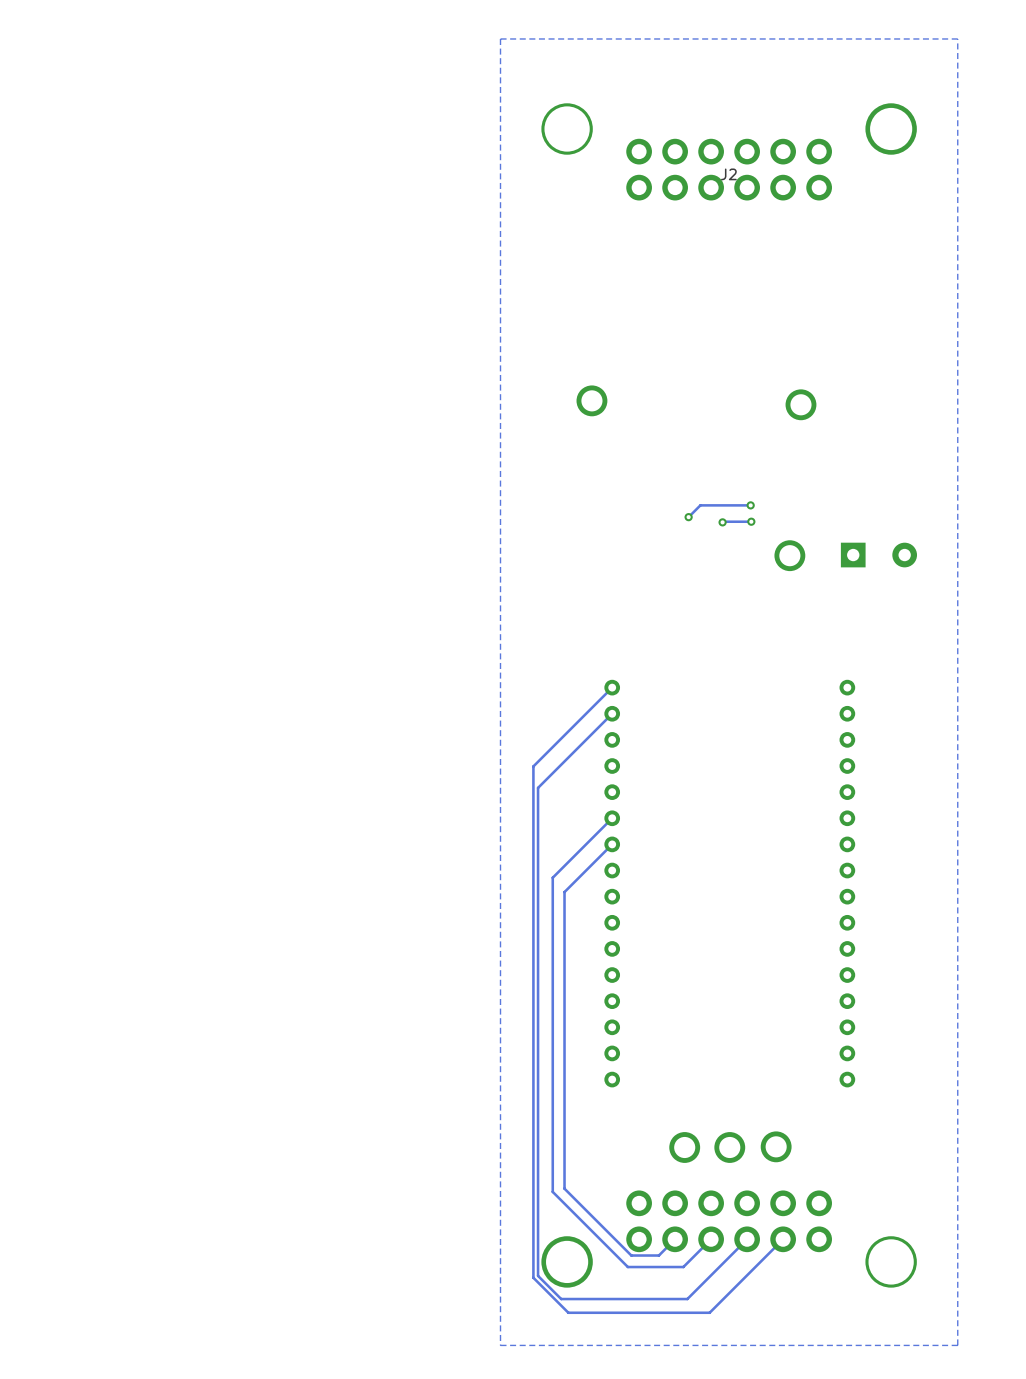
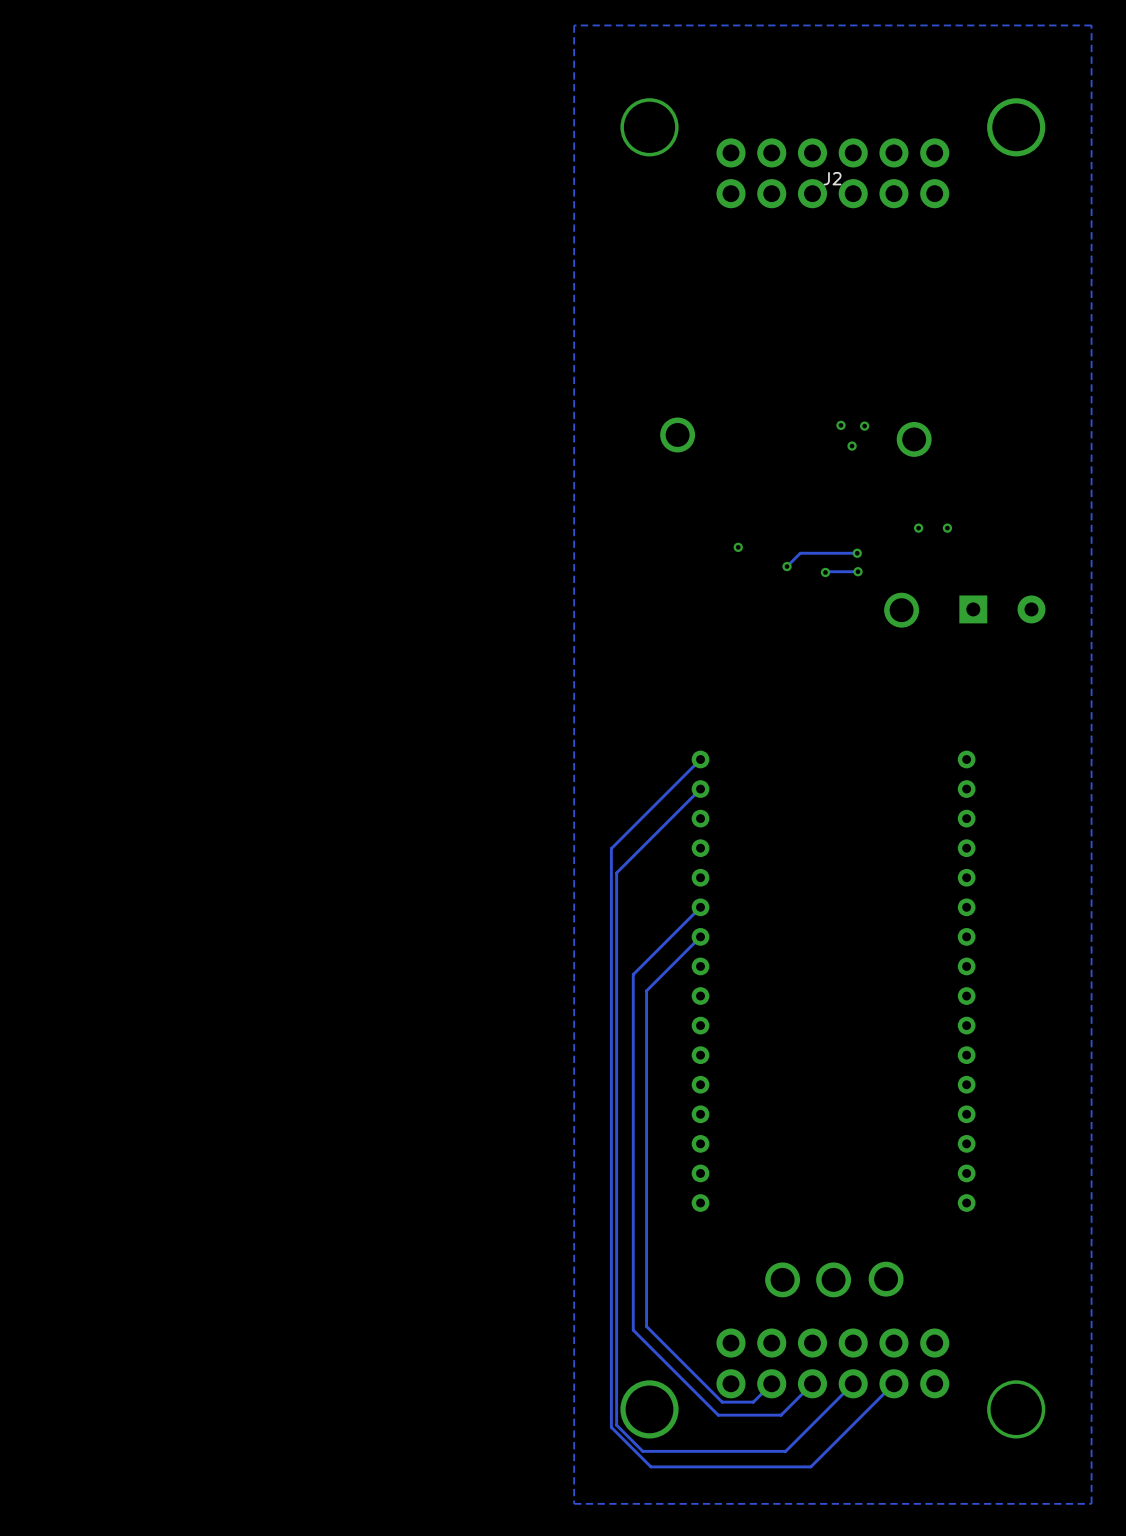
via: none -> (840, 425)
via: none -> (864, 426)
via: none -> (852, 446)
via: none -> (918, 528)
via: none -> (947, 528)
via: none -> (738, 547)

